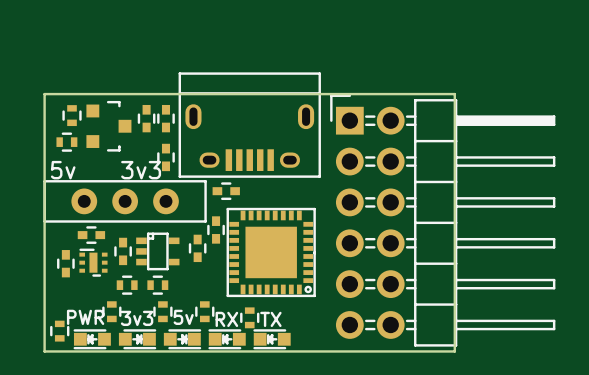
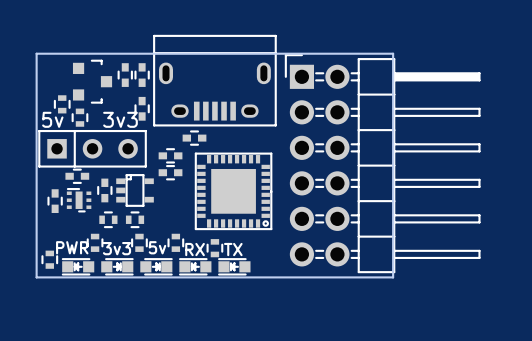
part position: (72, 115) -> (79, 117)
part rotation: 0° (66, 142) -> 90° clockwise (62, 104)
part: (125, 201) -> none
part: none -> (92, 148)
part: none -> (170, 155)
part: (216, 229) -> none
part: none -> (170, 172)
part: (197, 248) -> none

